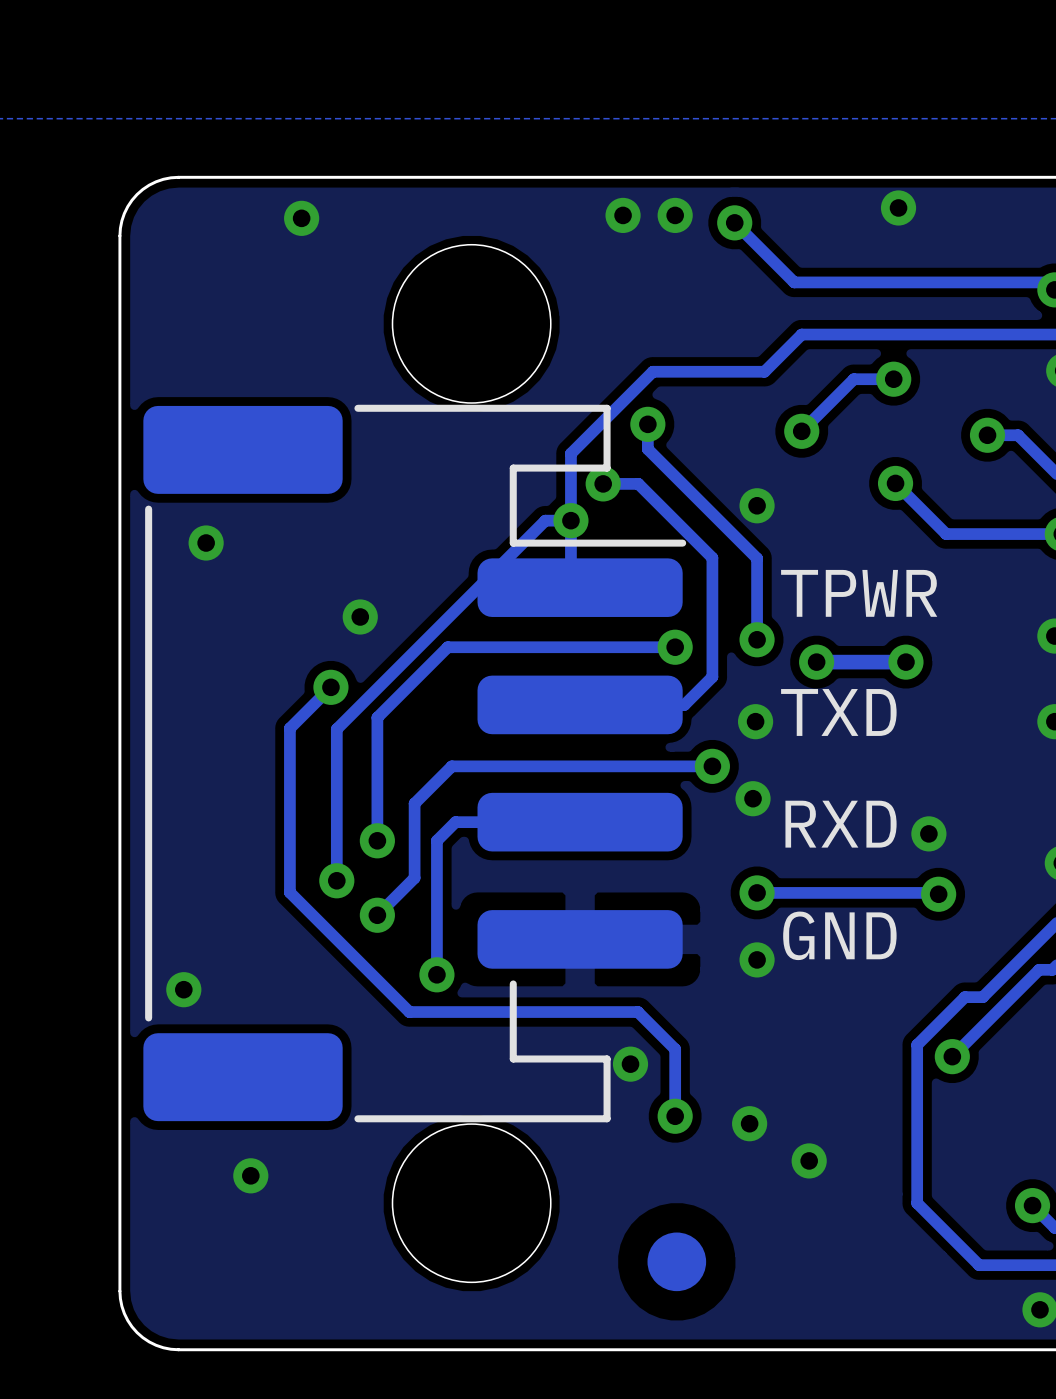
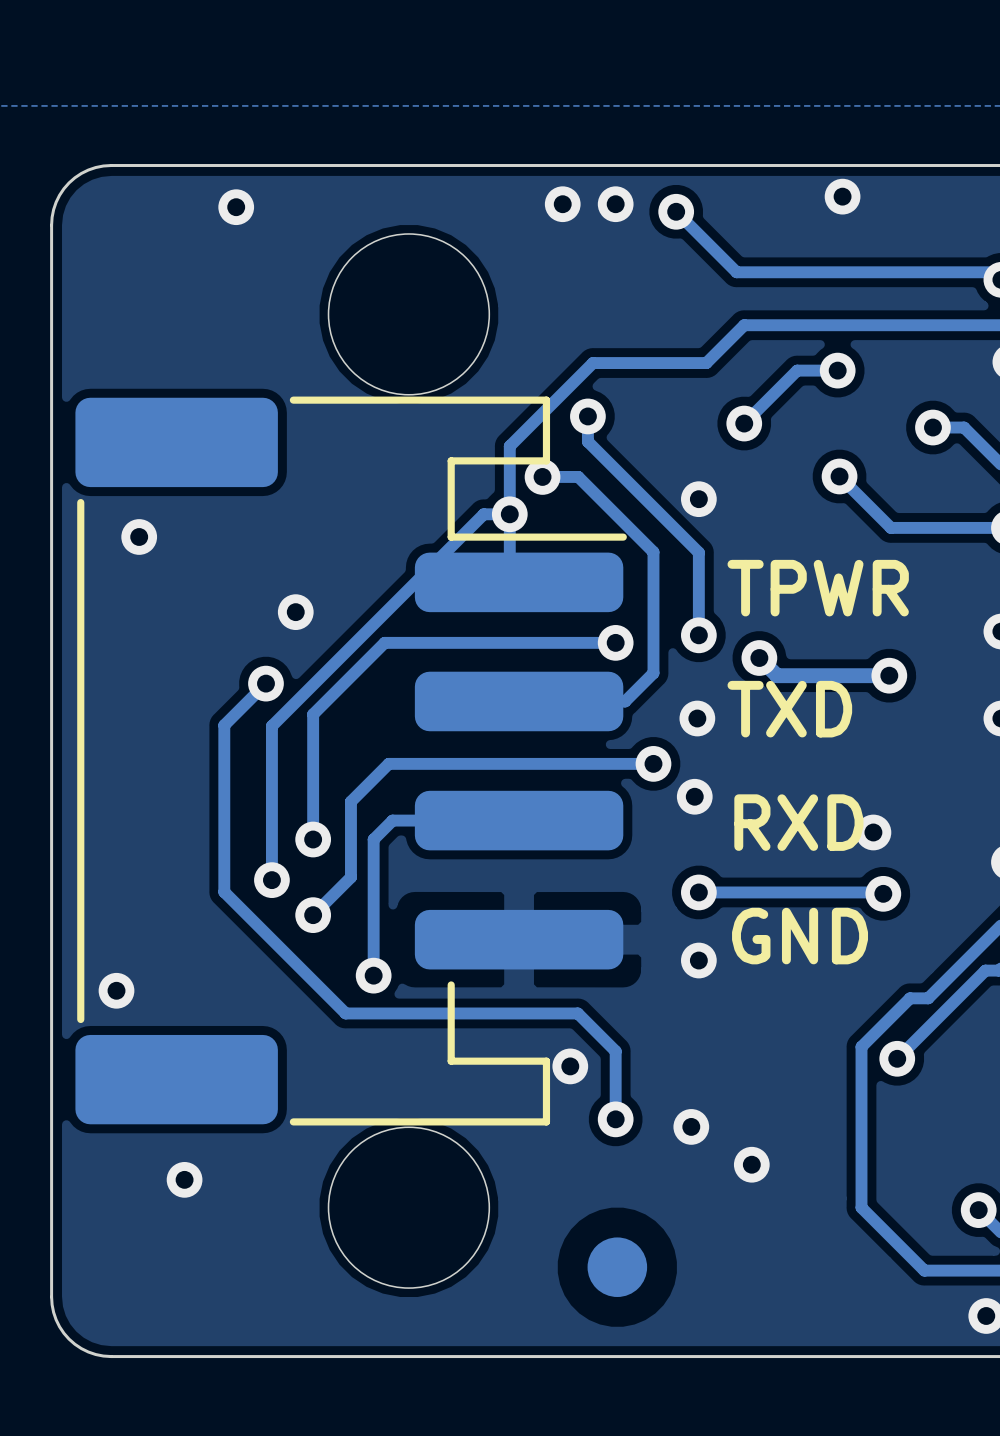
track: (905, 662) (816, 662) -> (889, 675) (777, 675) (759, 658)
via position: (905, 662) -> (889, 675)

